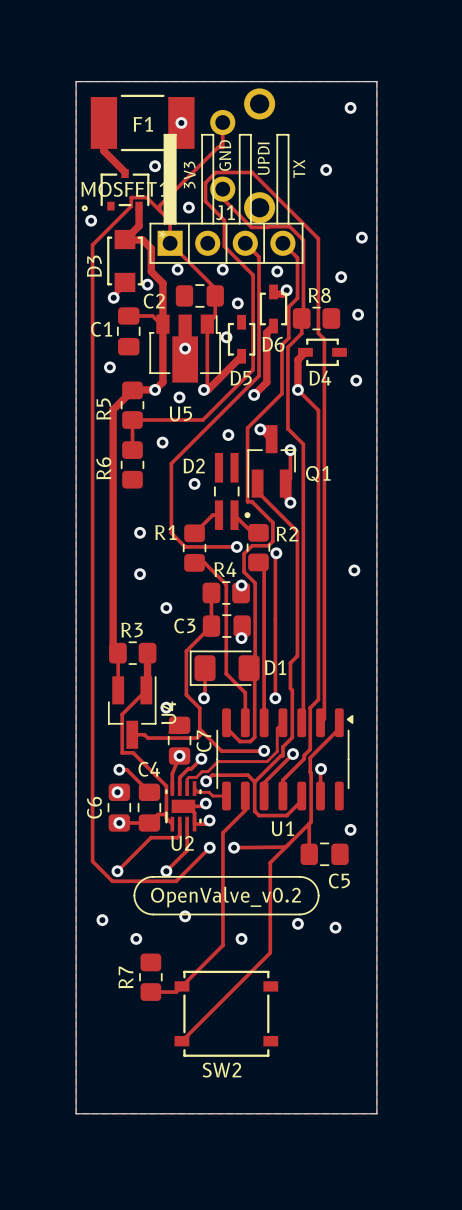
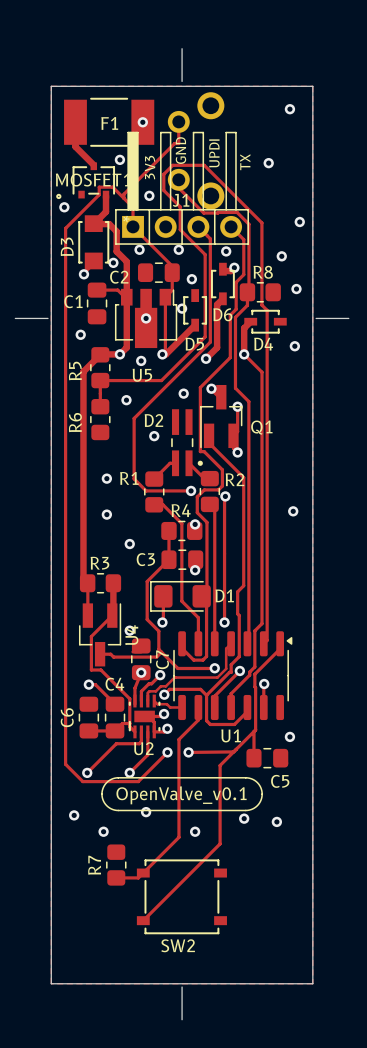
board edge: none -> (182, 48) (182, 81)
board edge: none -> (15, 318) (48, 318)
board edge: none -> (316, 318) (348, 318)
via: (117, 792) -> none
via: (119, 822) -> none
text: OpenValve_v0.2 (225, 897) -> OpenValve_v0.1 (181, 795)
board edge: none -> (182, 987) (182, 1019)

